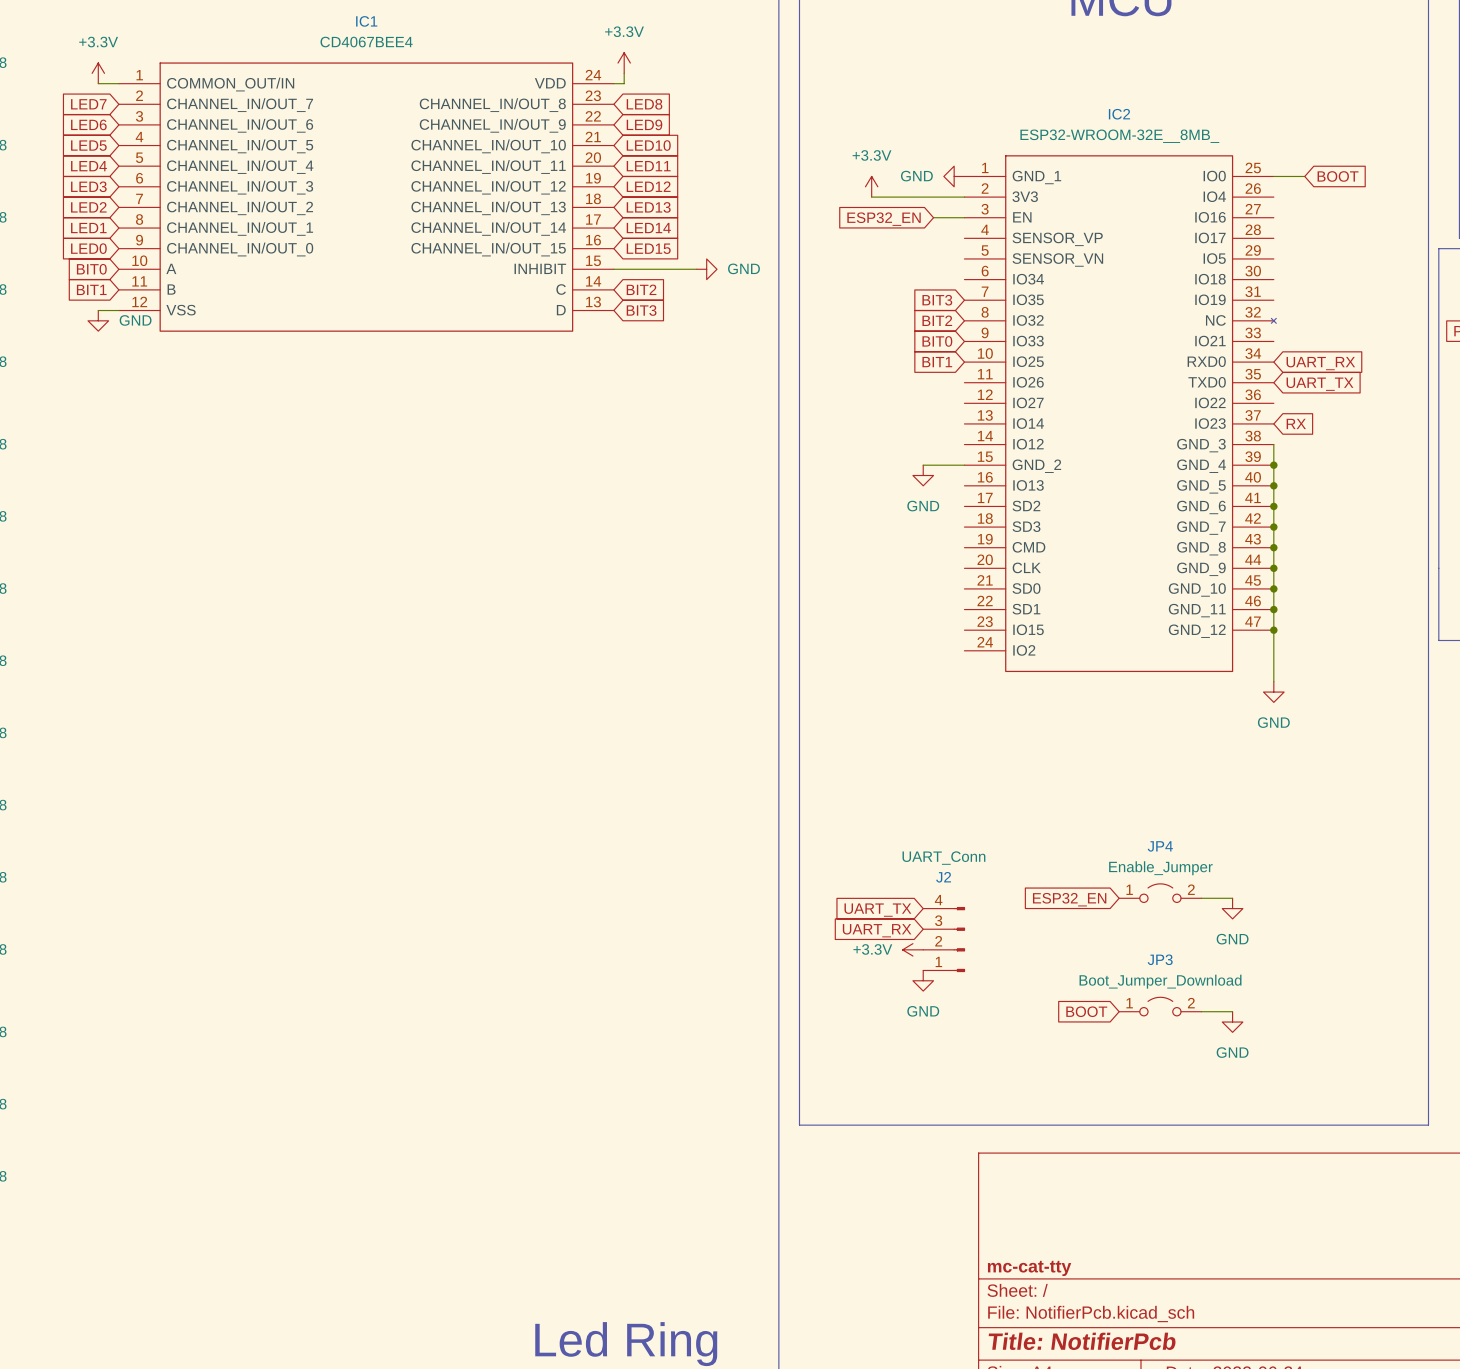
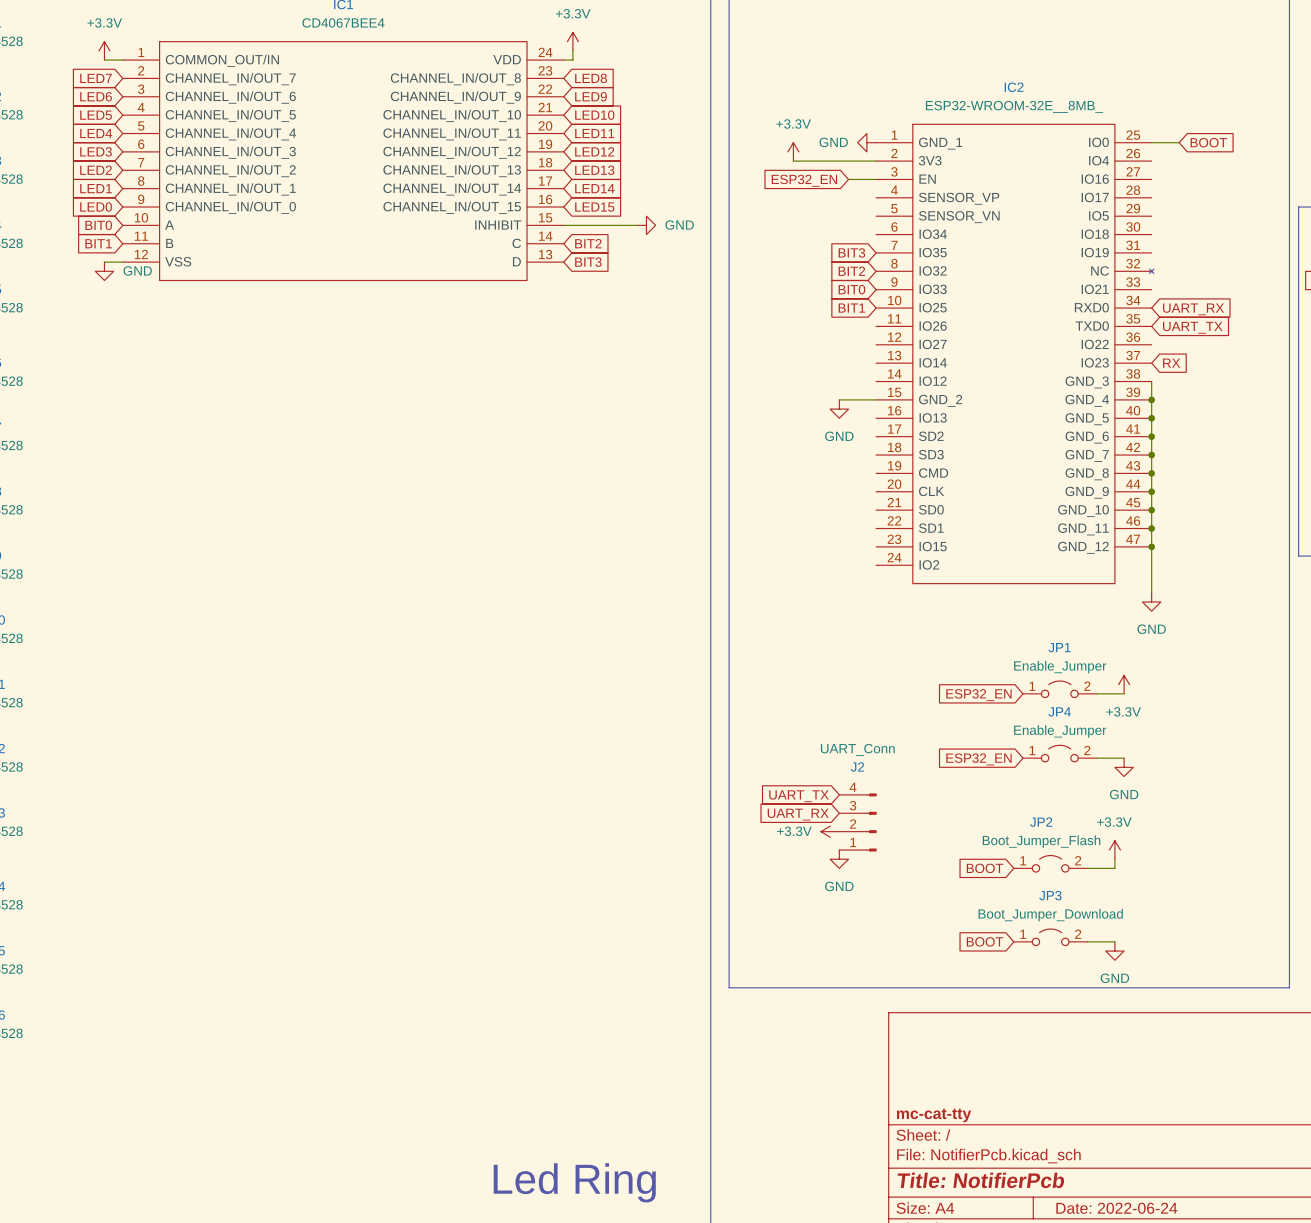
power symbol: none -> +3.3V (1124, 684)
JP1: none -> Enable_Jumper (1059, 689)
wire: none -> (1096, 693) (1124, 693)
global label: none -> ESP32_EN (978, 695)
JP4 position: (1160, 893) -> (1059, 753)
wire: (1201, 898) (1232, 898) -> (1096, 758) (1124, 758)
global label position: ESP32_EN (1069, 899) -> ESP32_EN (978, 759)
power symbol position: GND (1232, 908) -> GND (1124, 767)
power symbol: none -> +3.3V (1114, 850)
wire: none -> (1114, 859) (1114, 868) (1087, 868)
JP2: none -> Boot_Jumper_Flash (1050, 863)
JP3 position: (1160, 1006) -> (1050, 937)
global label position: BOOT (1086, 1011) -> BOOT (985, 868)
wire: (1201, 1011) (1232, 1011) -> (1087, 941) (1114, 941)
power symbol position: GND (1232, 1022) -> GND (1114, 951)
global label: none -> BOOT (985, 941)

